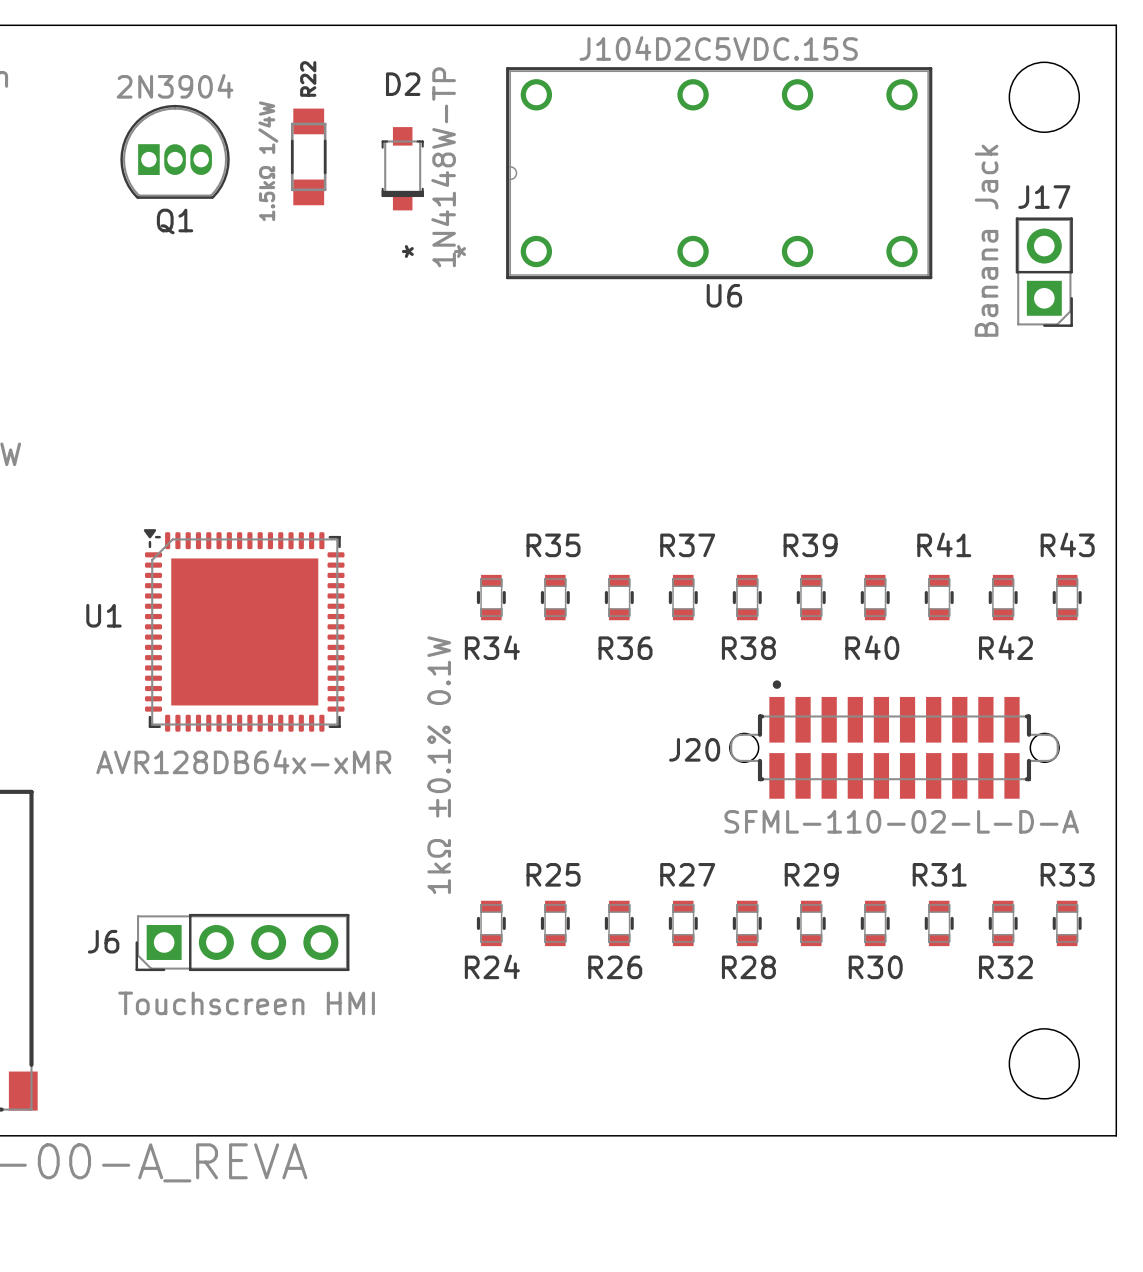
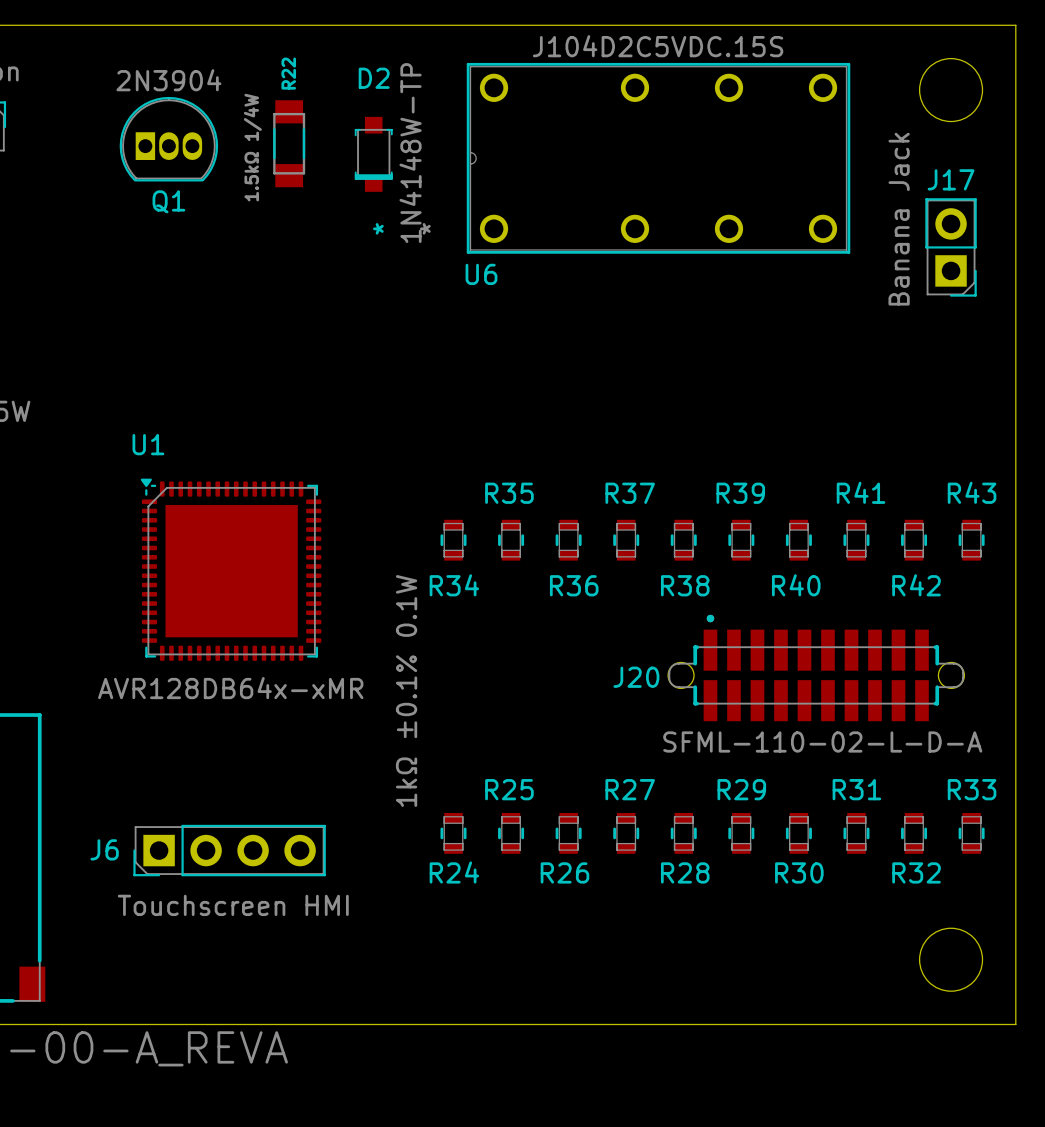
U6 name position: U6 (724, 295) -> U6 (481, 274)
U1 name position: U1 (103, 615) -> U1 (148, 444)

